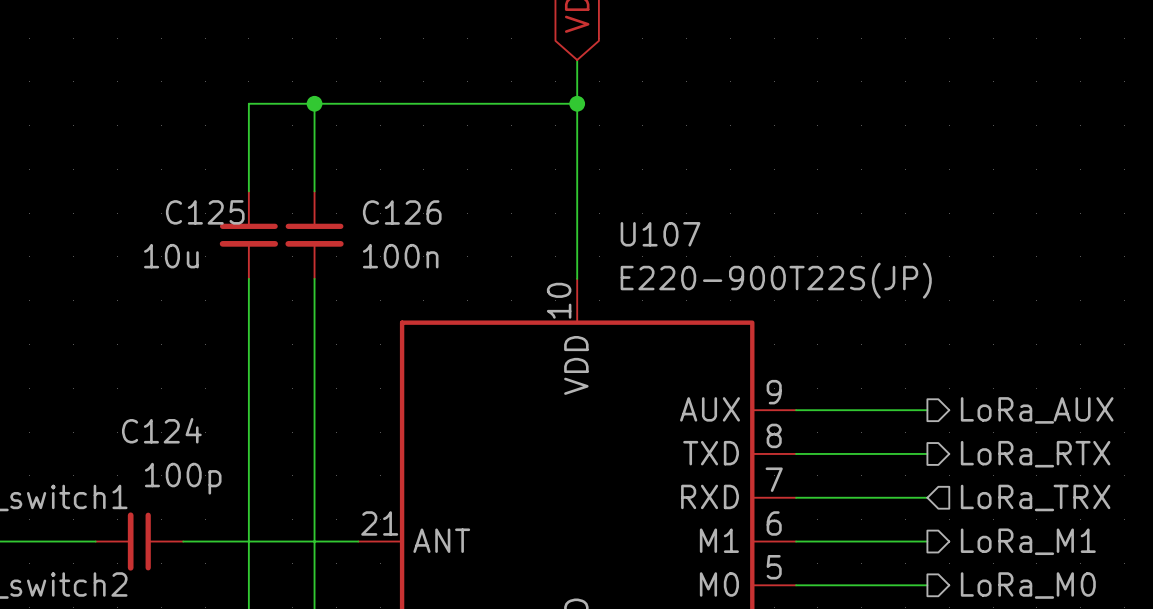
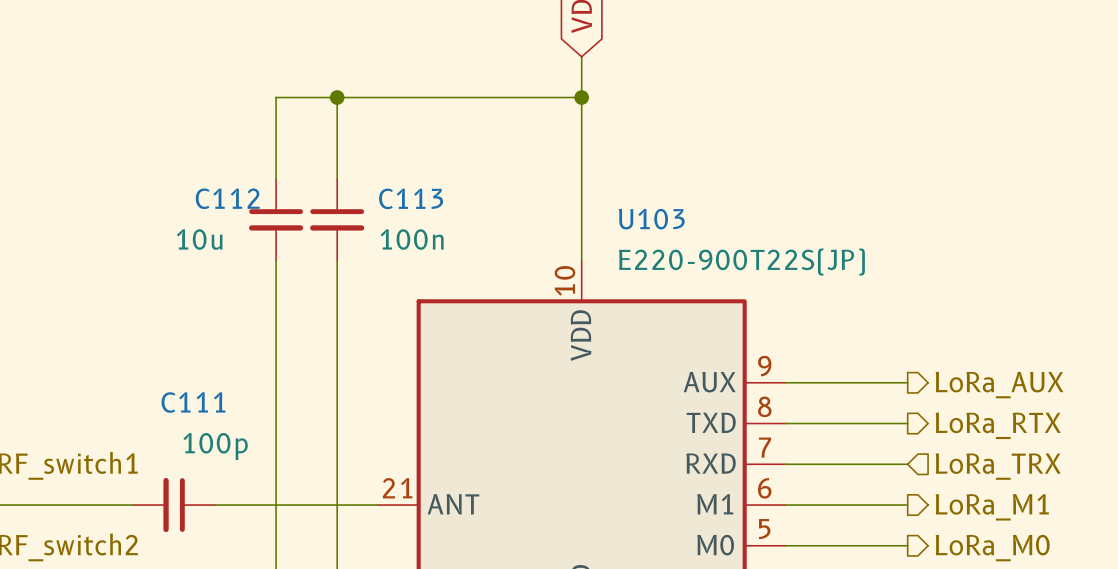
C125 name: C125 (205, 212) -> C112 (227, 198)
C126 name: C126 (402, 212) -> C113 (411, 198)
U107 name: U107 (660, 234) -> U103 (651, 219)
C124 name: C124 (161, 430) -> C111 (193, 402)

